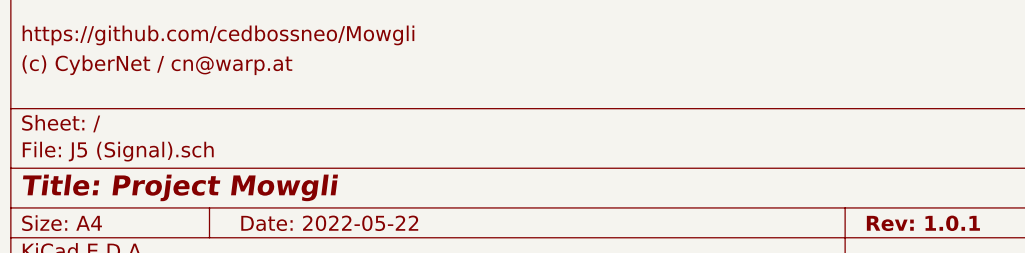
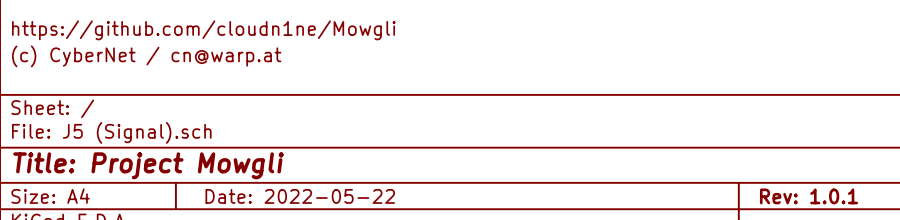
title block: https://github.com/cedbossneo/Mowgli (218, 35) -> https://github.com/cloudn1ne/Mowgli (203, 30)

